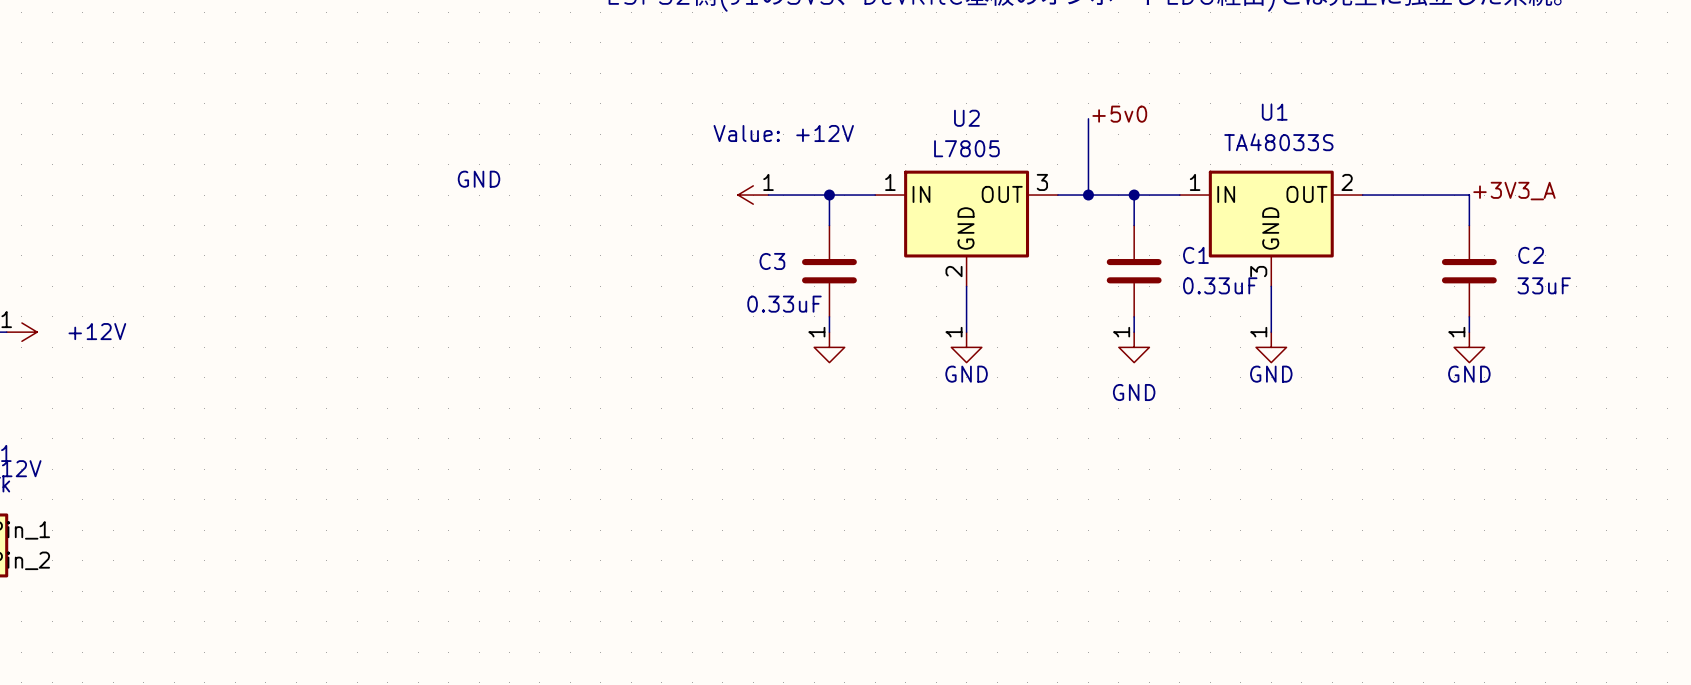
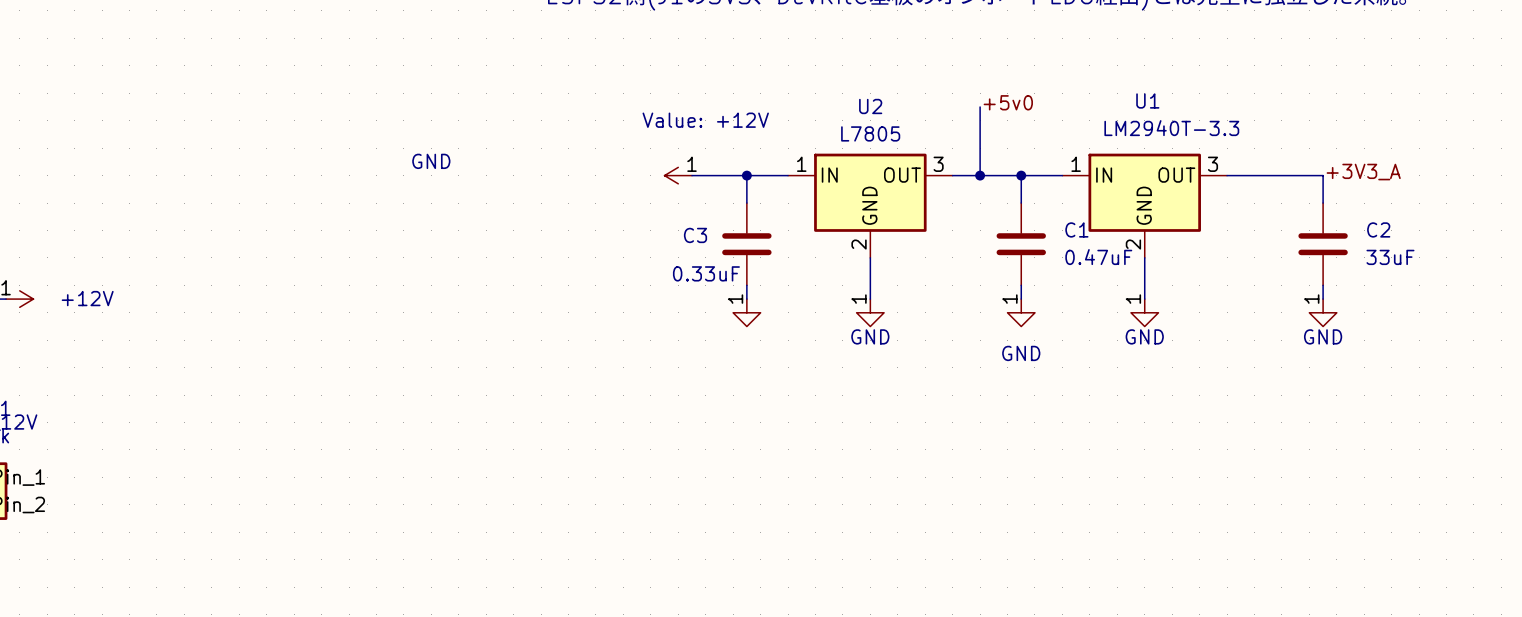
U1 value: TA48033S (1278, 142) -> LM2940T-3.3 (1171, 128)
U1 pin number: 2 (1347, 182) -> 3 (1213, 164)
U1 pin number: 3 (1258, 271) -> 2 (1133, 244)
C1 value: 0.33uF (1220, 285) -> 0.47uF (1098, 257)

